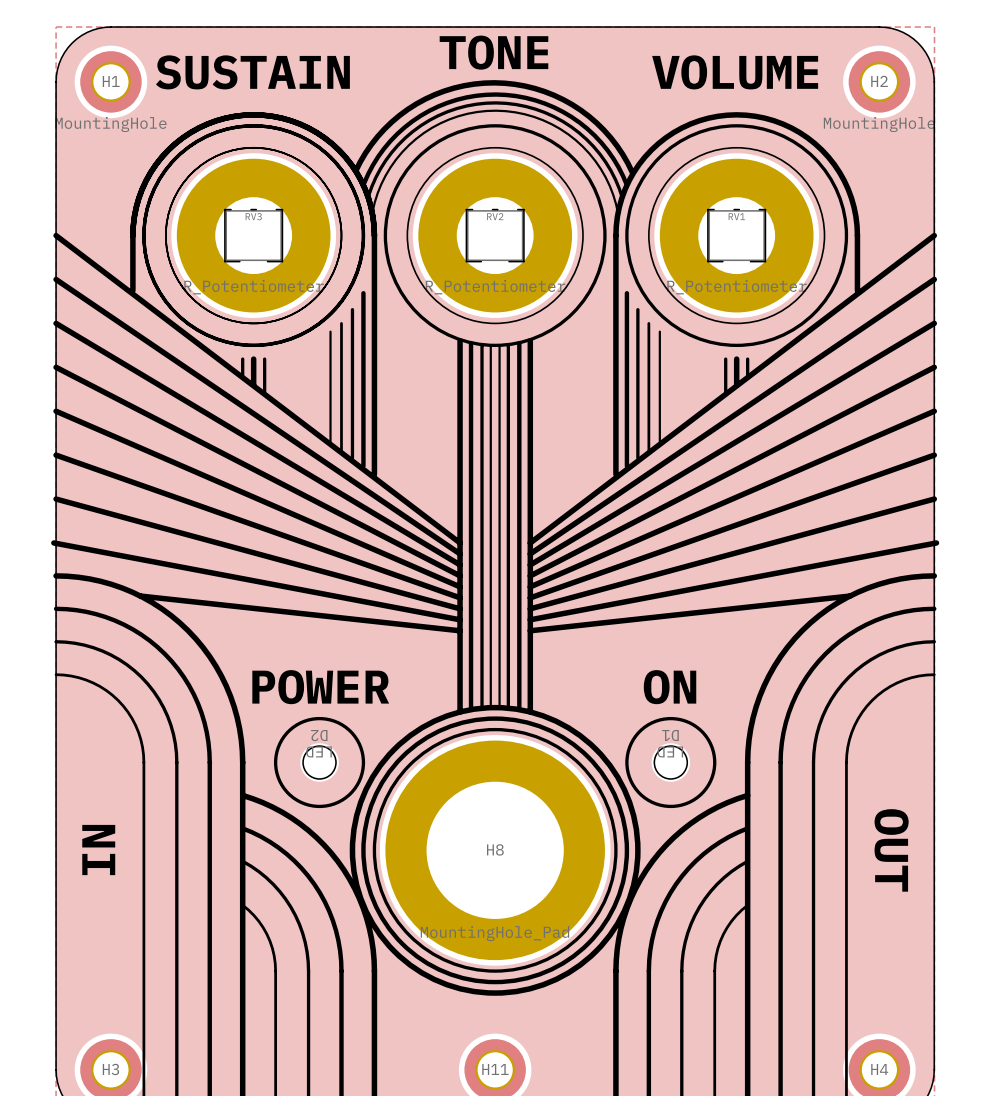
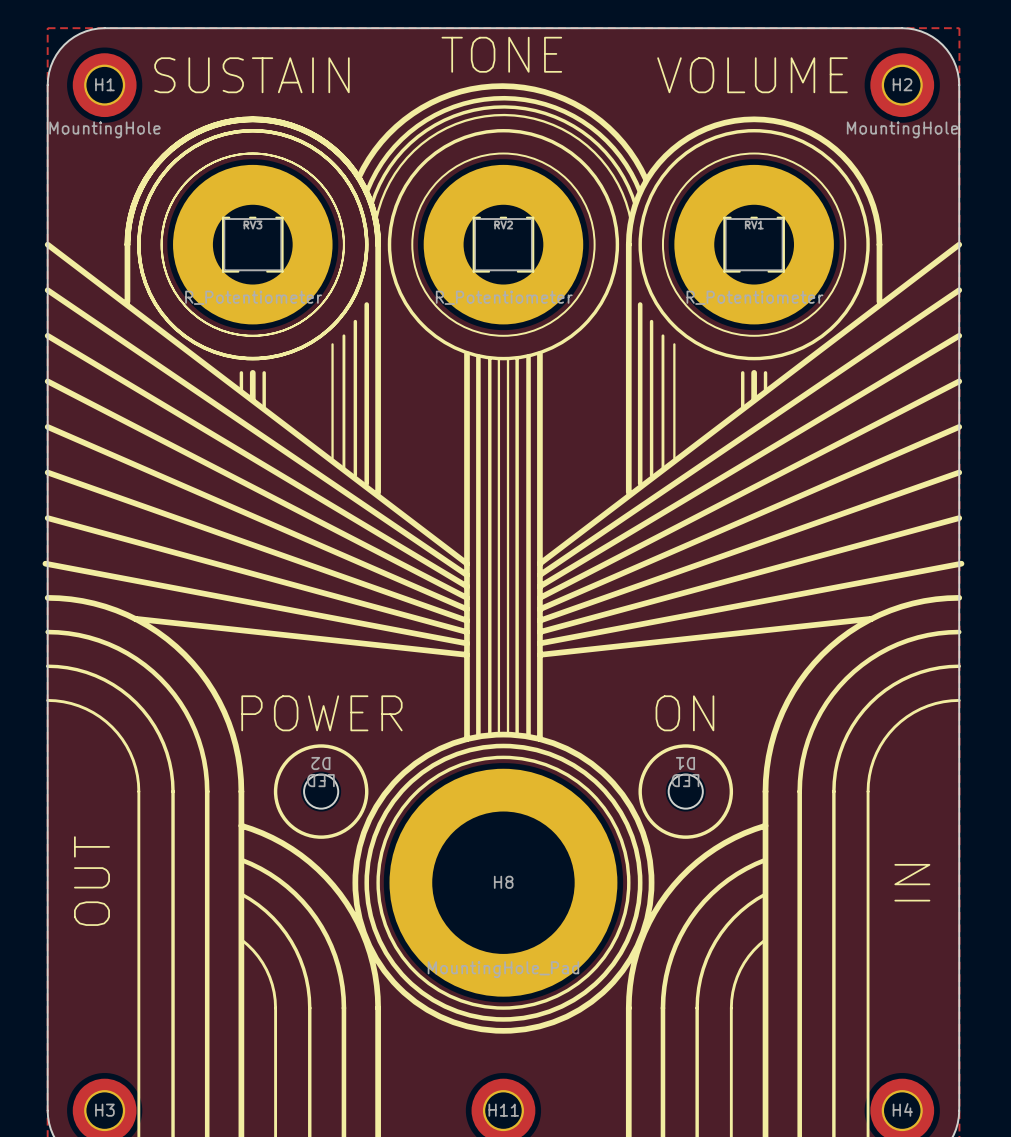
text: IN (98, 850) -> OUT (91, 881)
text: OUT (891, 850) -> IN (912, 882)

